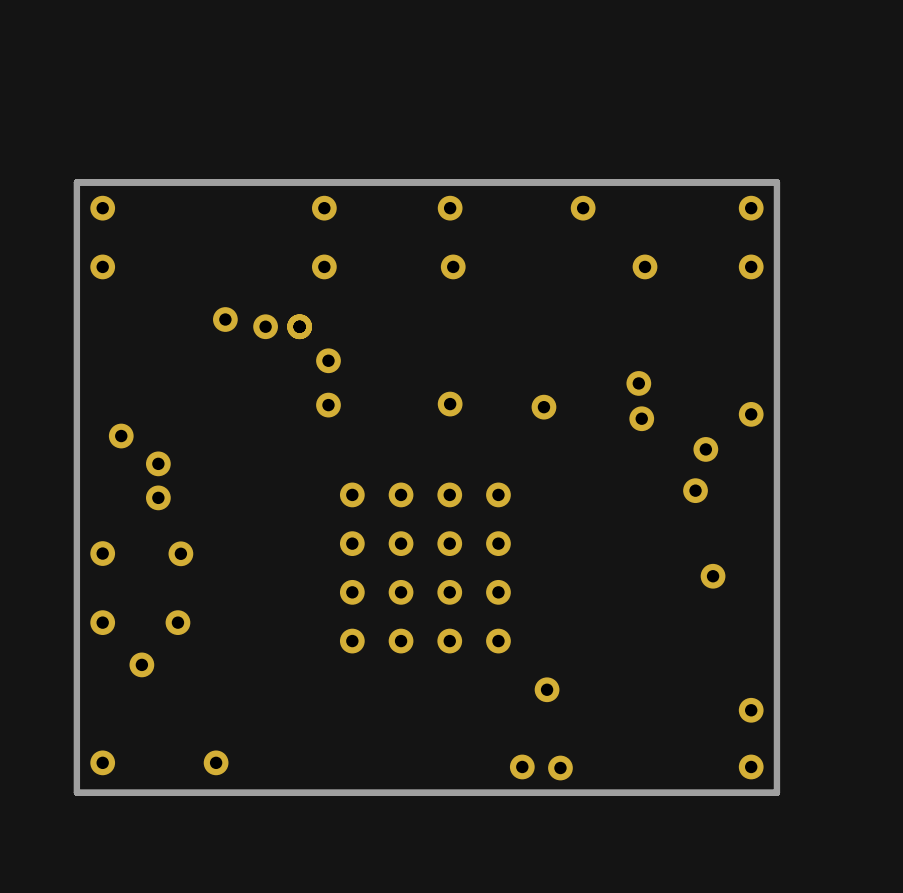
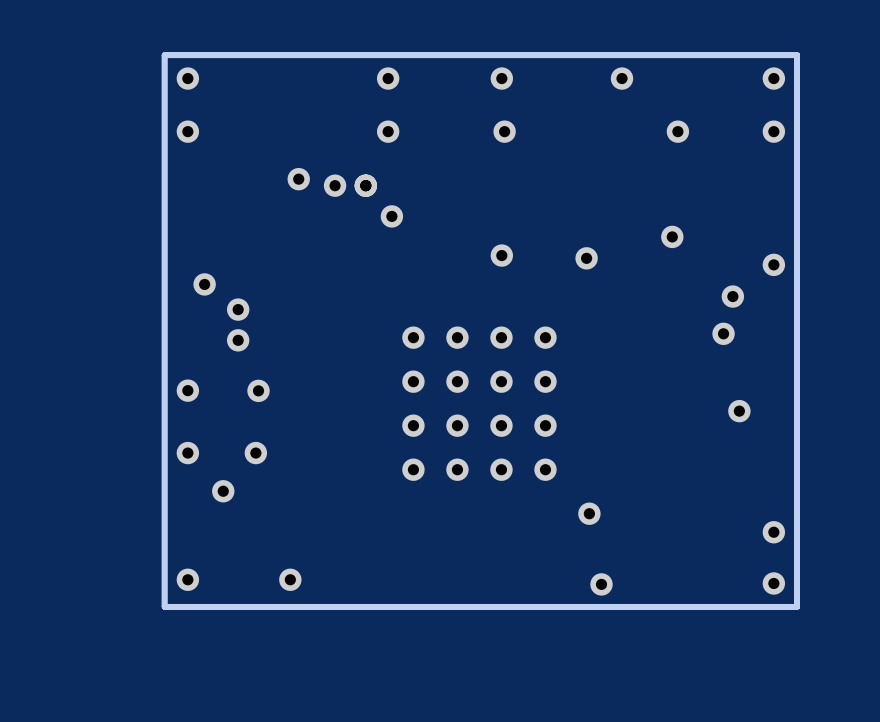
part: (328, 405) -> none
part: (641, 418) -> none
part: (522, 766) -> none

